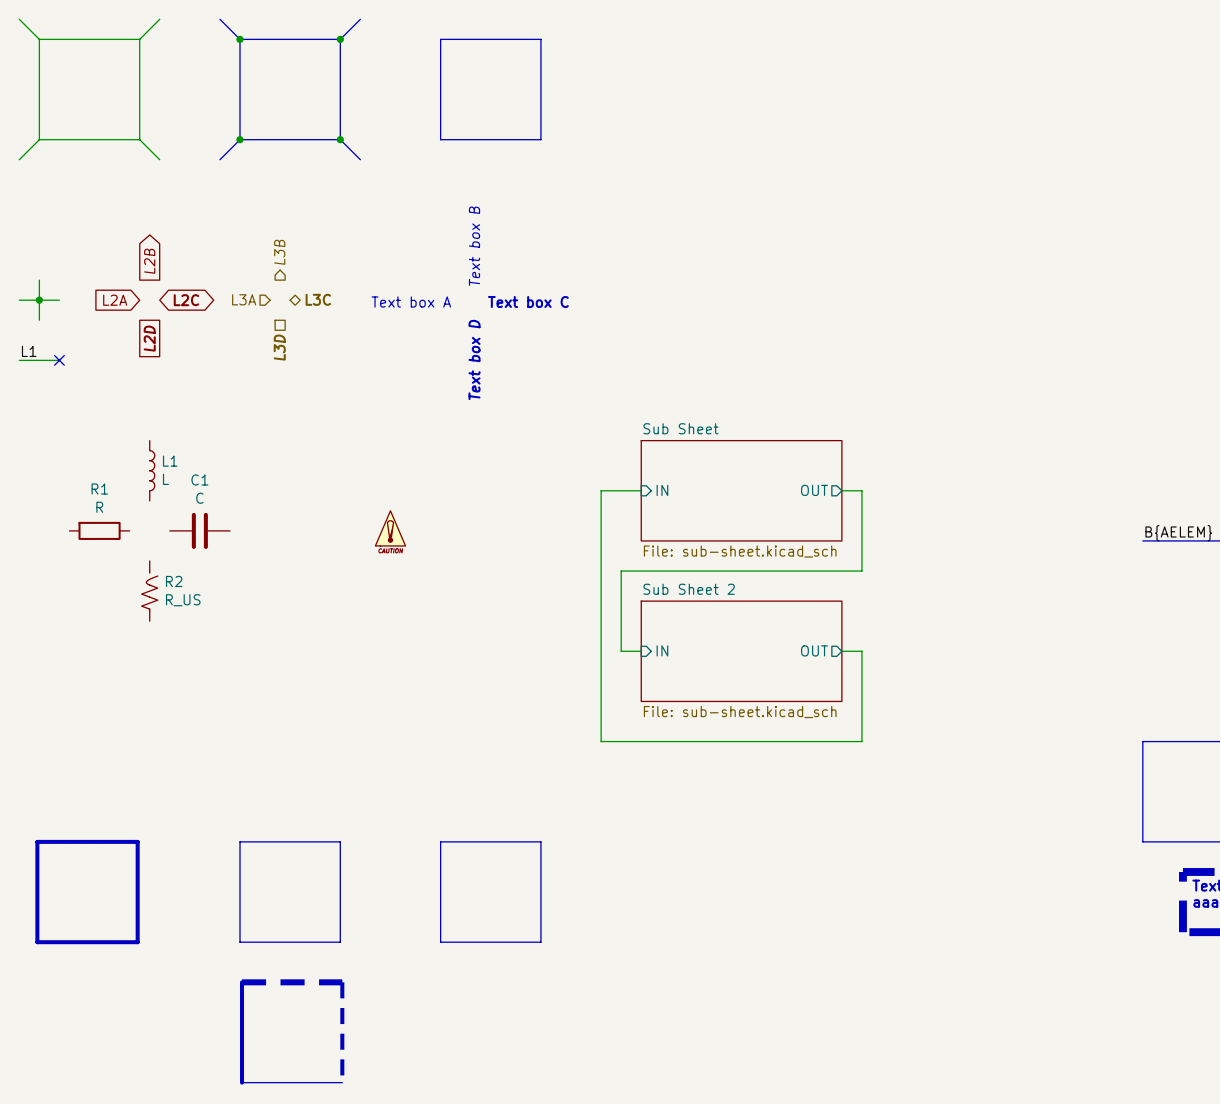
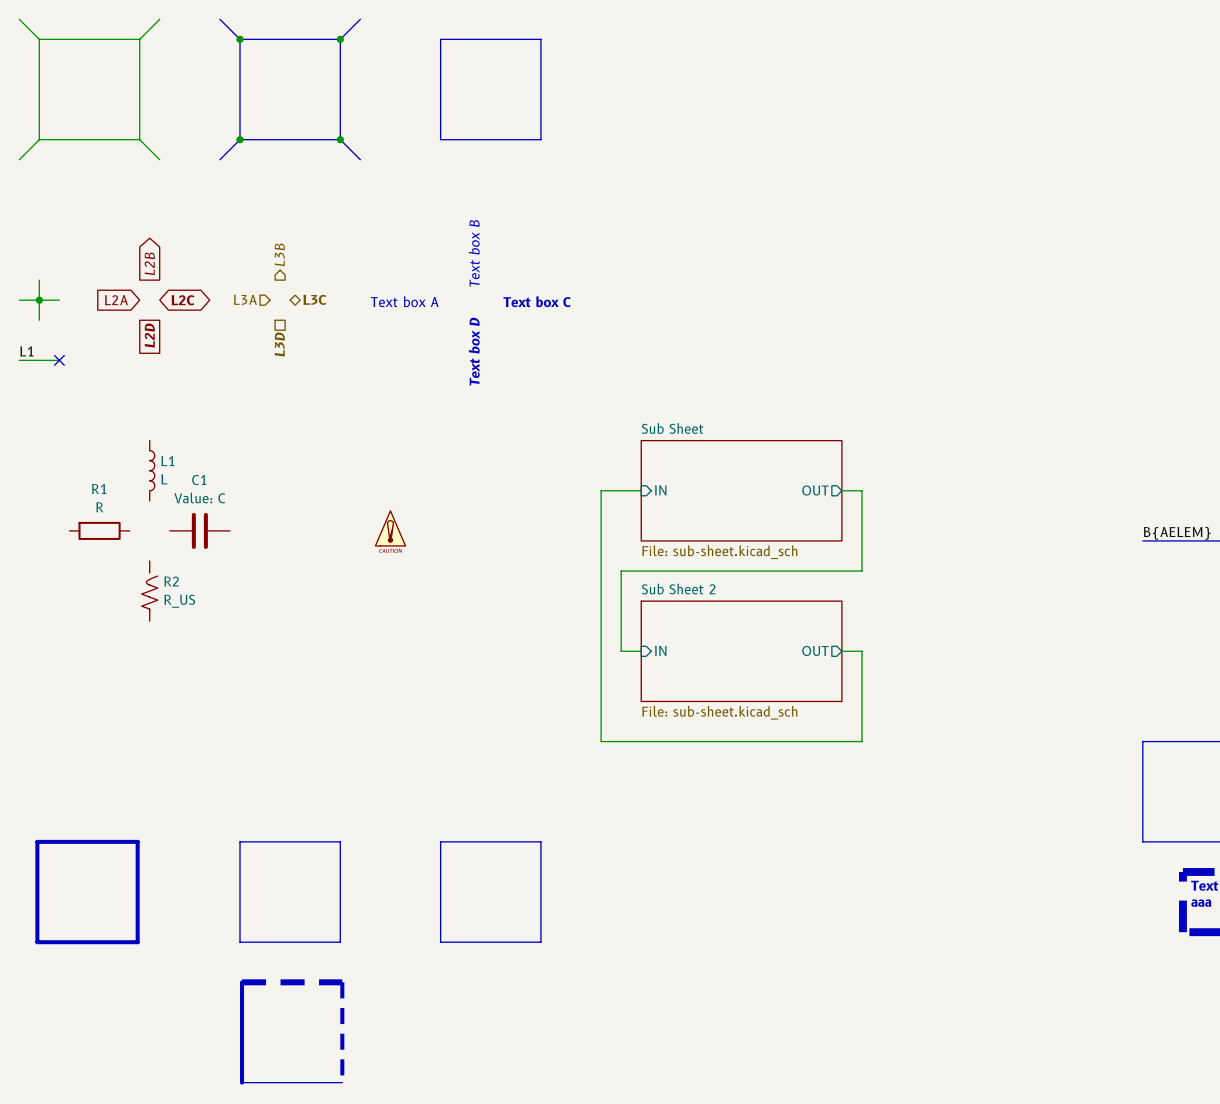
C1 value: C (199, 498) -> Value: C (199, 497)

